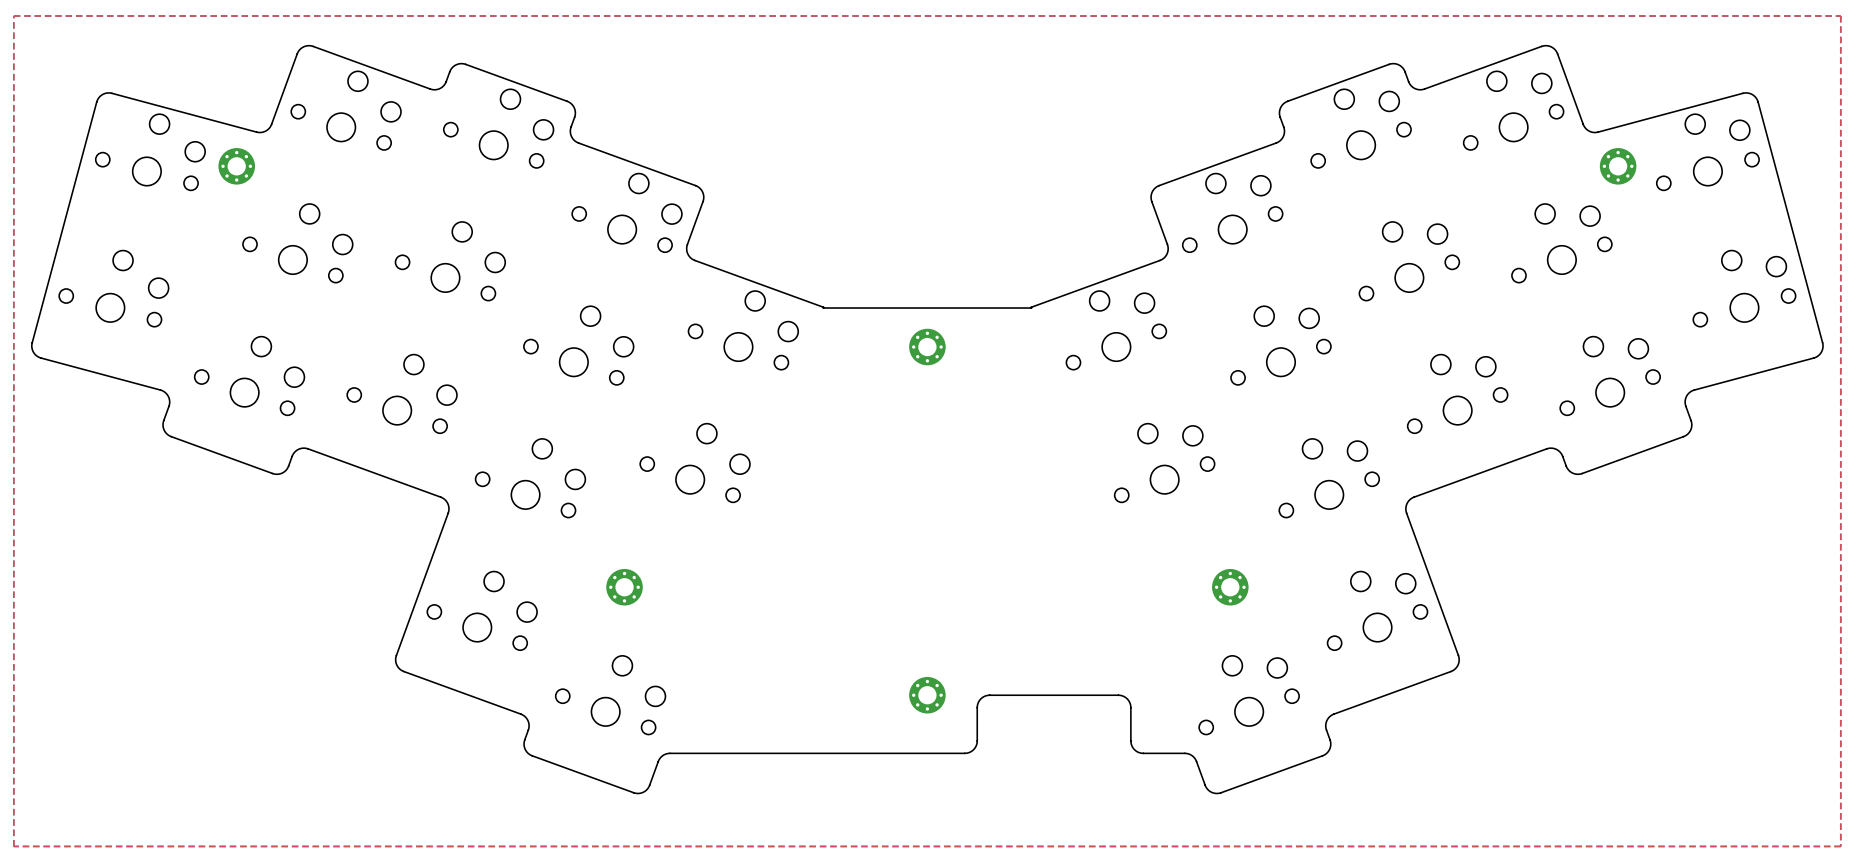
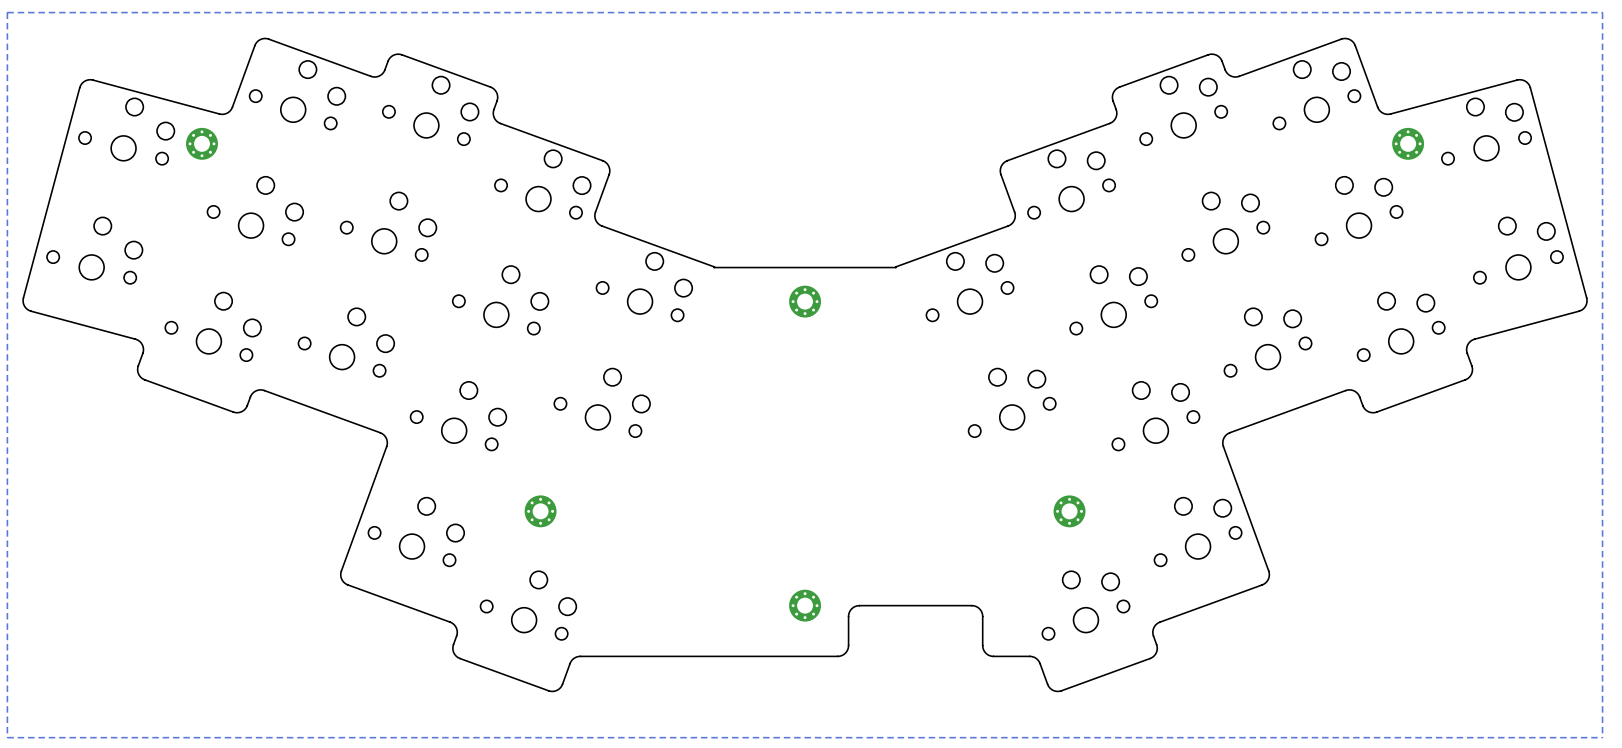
top zone outline: (13, 16) (13, 846) (1840, 846) (1840, 16) (13, 16) -> none

